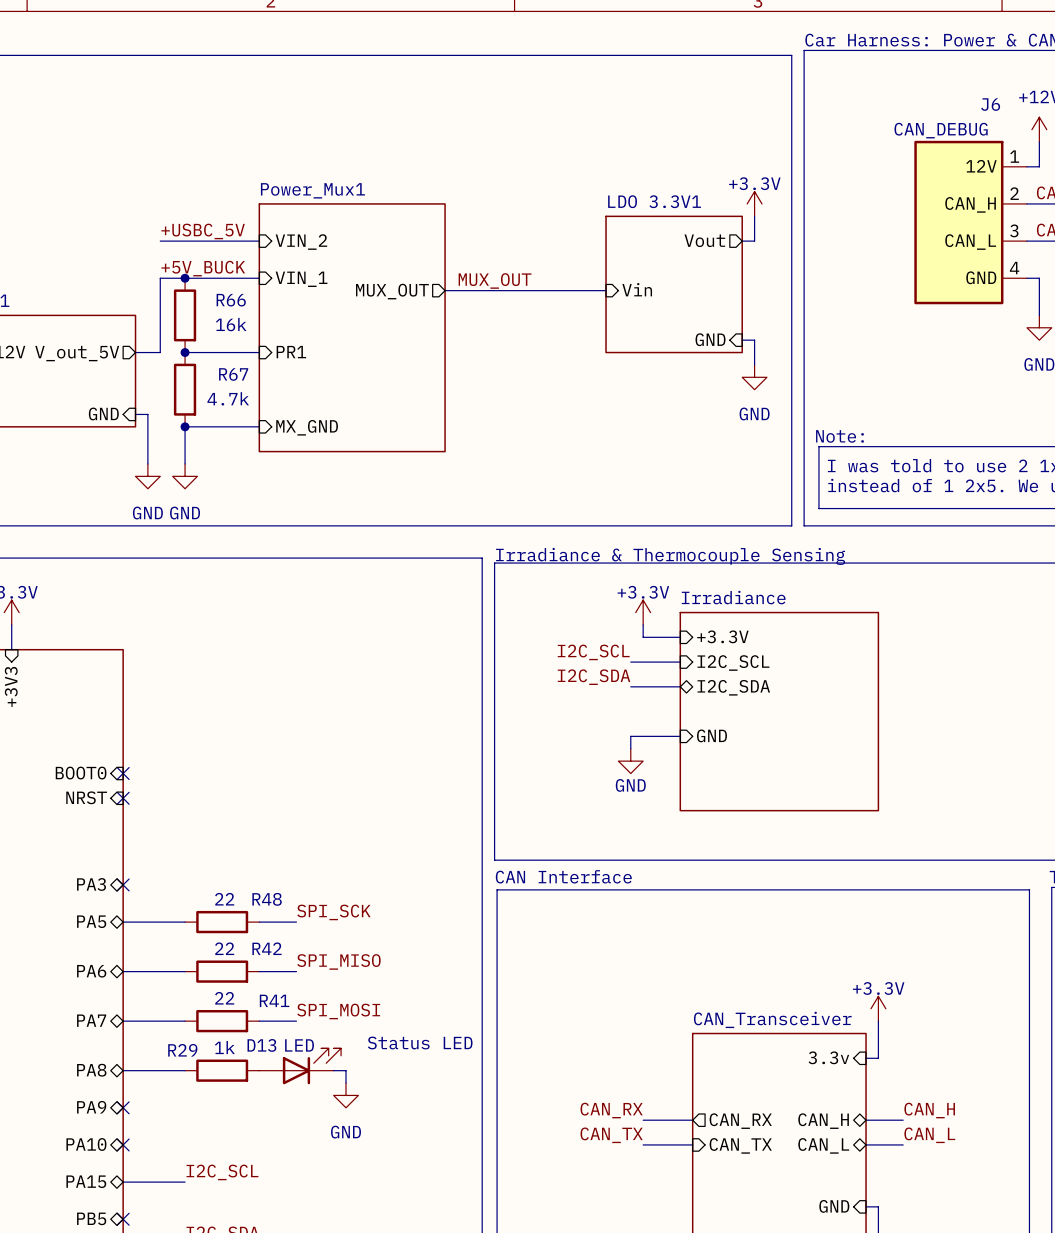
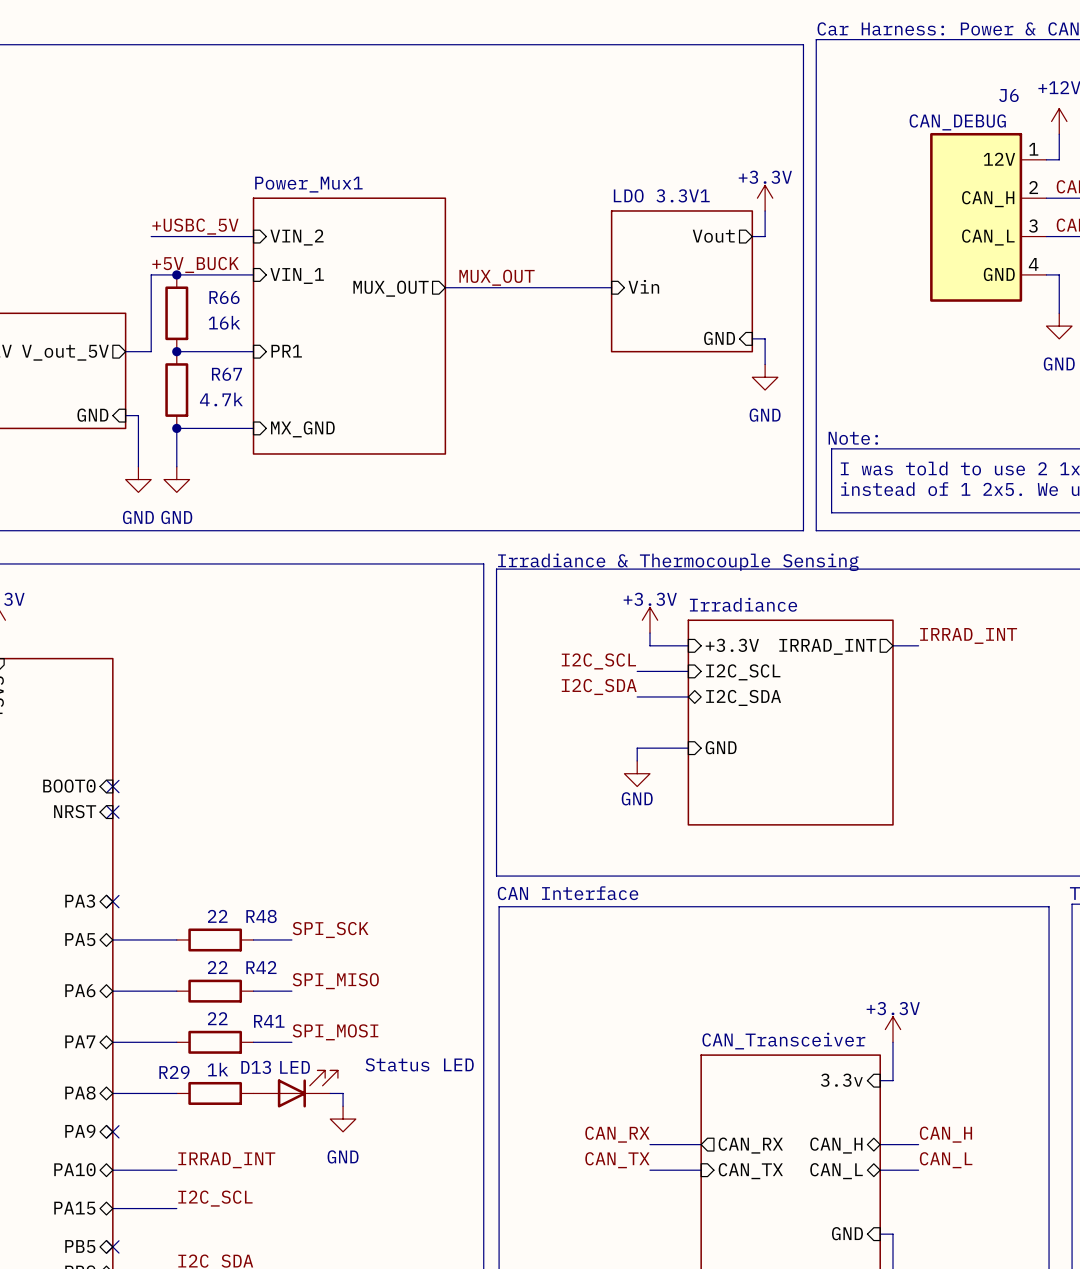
label: none -> IRRAD_INT (968, 635)
wire: none -> (892, 645) (918, 645)
sheet pin: none -> IRRAD_INT (827, 646)
label: none -> IRRAD_INT (226, 1160)
wire: none -> (112, 1170) (176, 1170)
no-connect mark: (123, 1144) -> none

